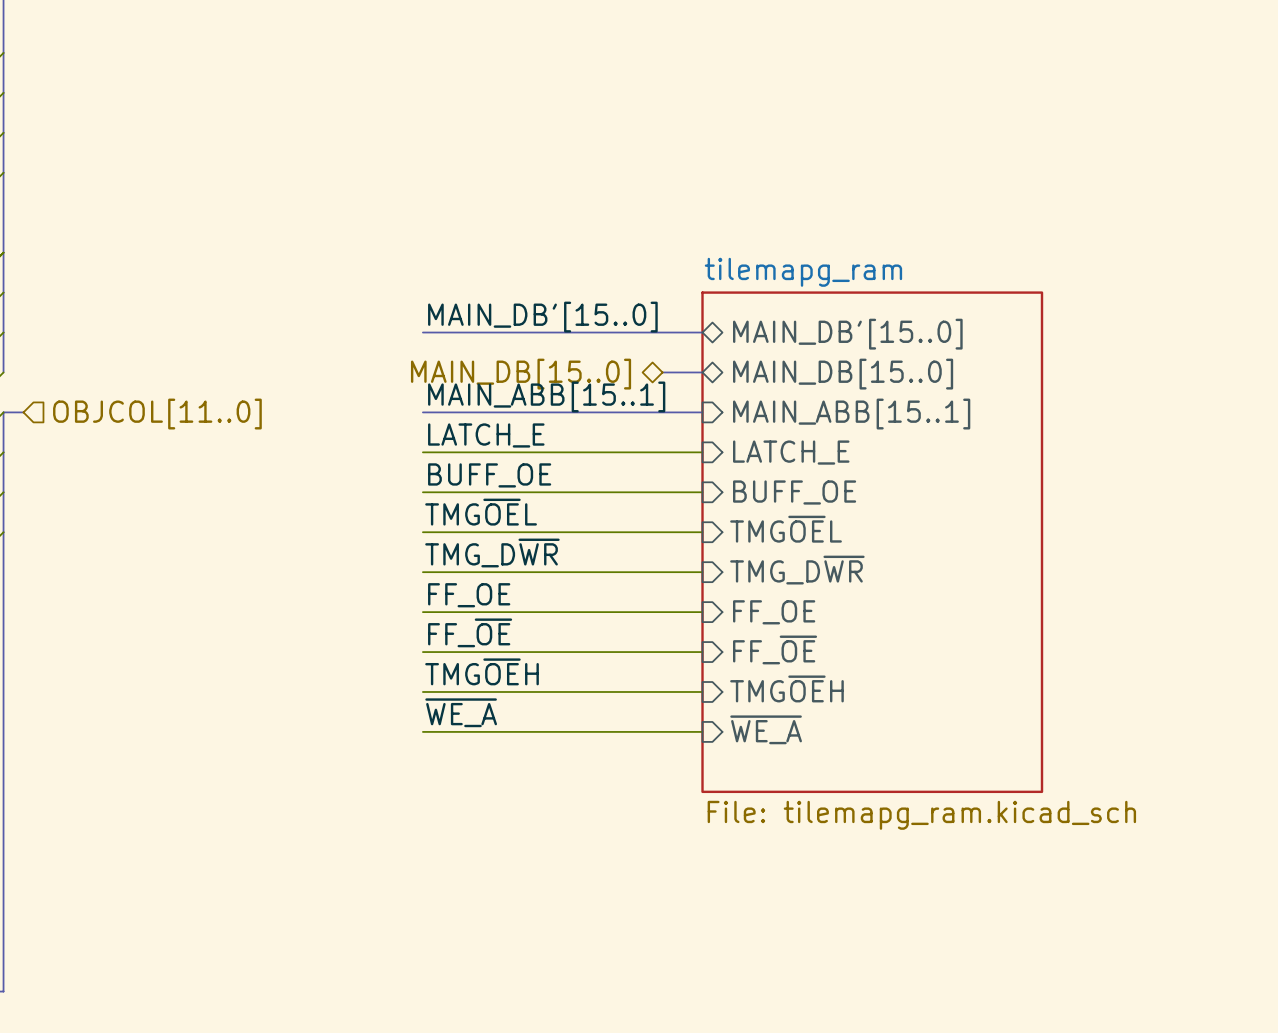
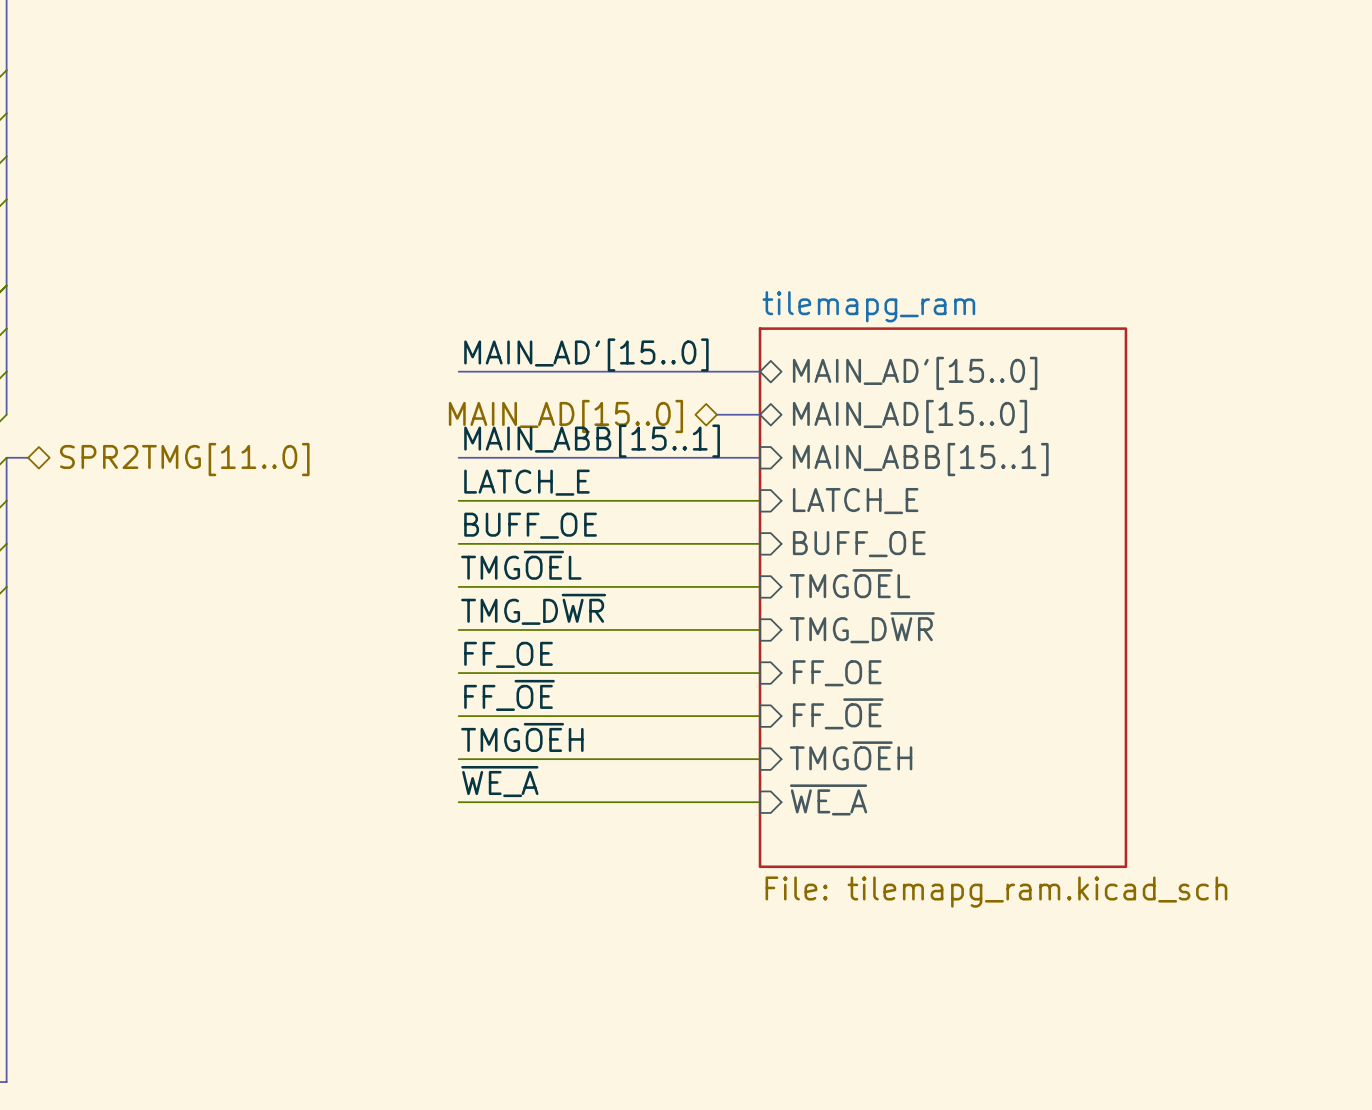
label: MAIN_DB'[15..0] (542, 317) -> MAIN_AD'[15..0] (586, 355)
sheet pin: MAIN_DB'[15..0] (847, 334) -> MAIN_AD'[15..0] (915, 373)
hierarchical label: MAIN_DB[15..0] (521, 374) -> MAIN_AD[15..0] (565, 416)
sheet pin: MAIN_DB[15..0] (843, 374) -> MAIN_AD[15..0] (910, 416)
hierarchical label shape: input (157, 414) -> bidirectional (184, 459)
hierarchical label: OBJCOL[11..0] (157, 414) -> SPR2TMG[11..0] (184, 459)

